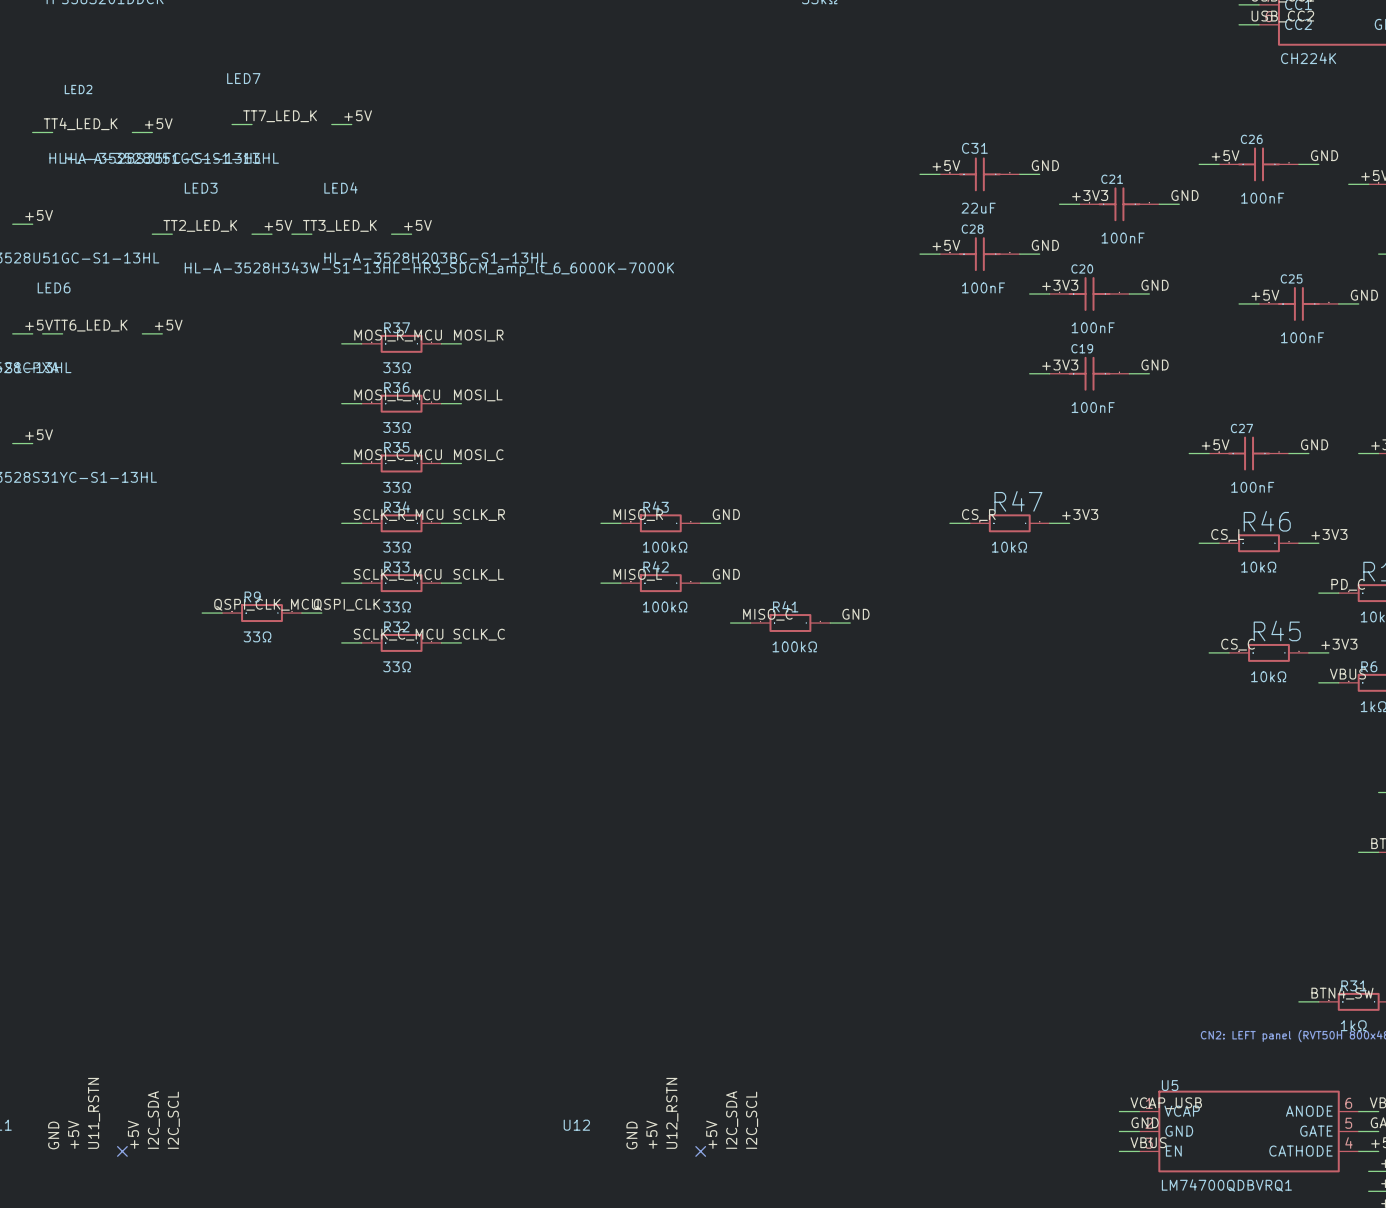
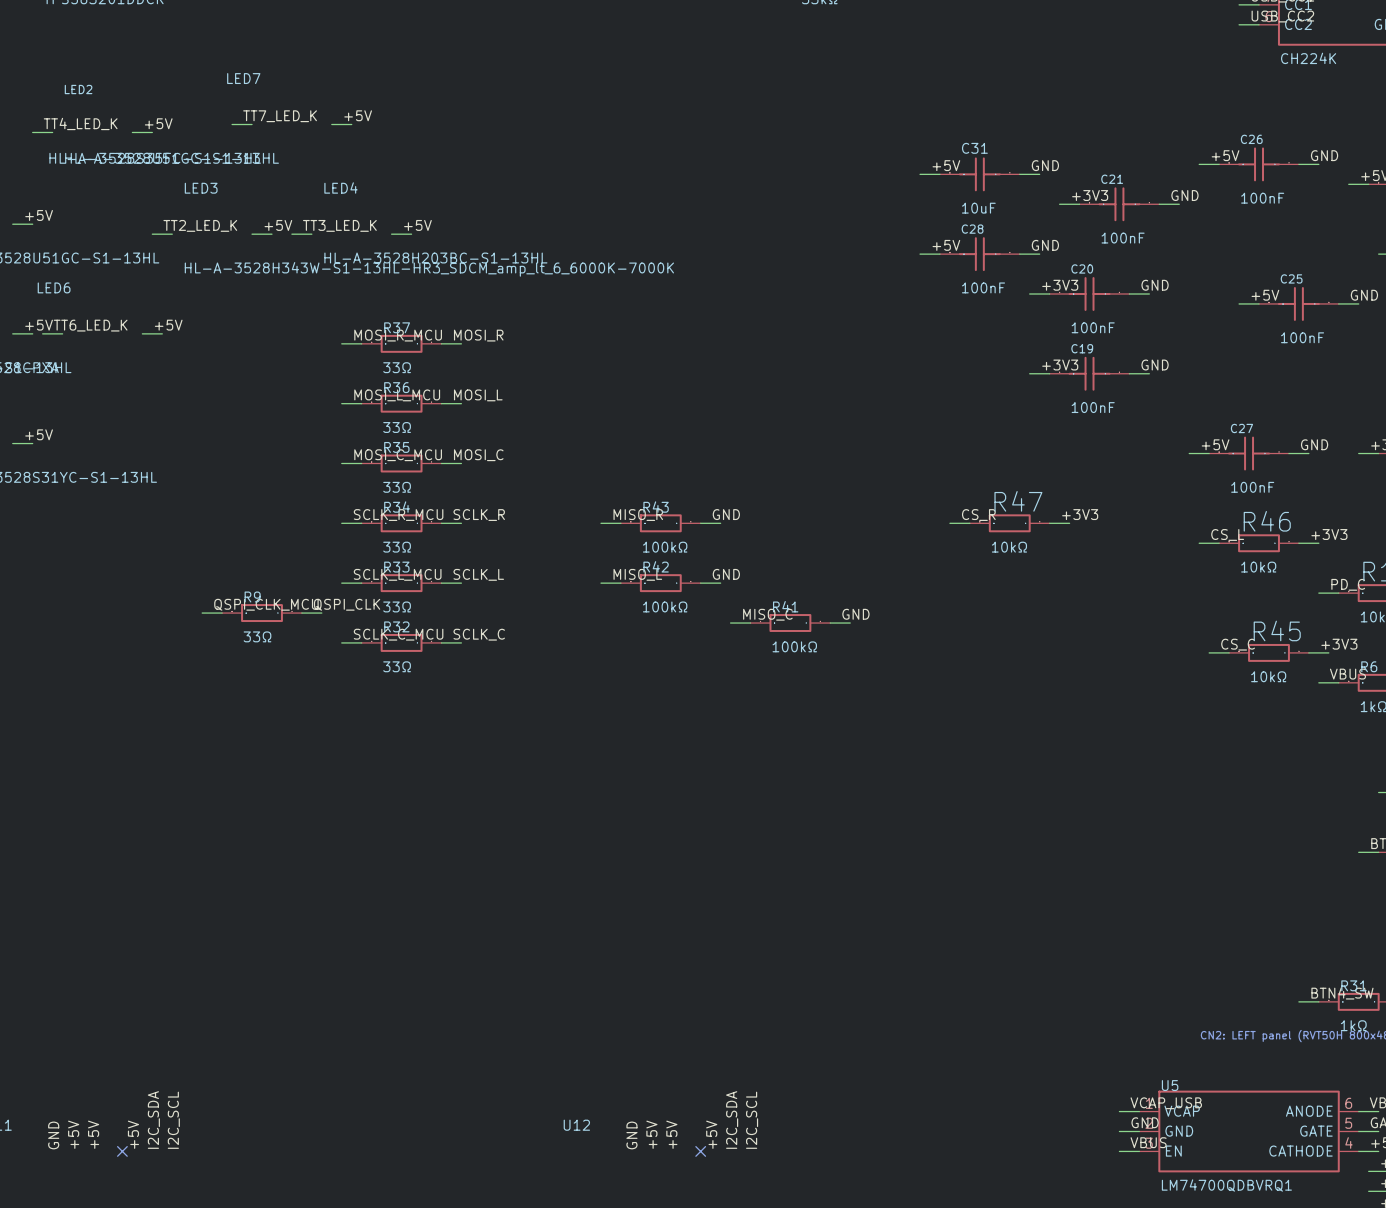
C31 value: 22uF (978, 208) -> 10uF (978, 208)
label: U11_RSTN (94, 1113) -> +5V (93, 1134)
label: U12_RSTN (672, 1113) -> +5V (671, 1134)

